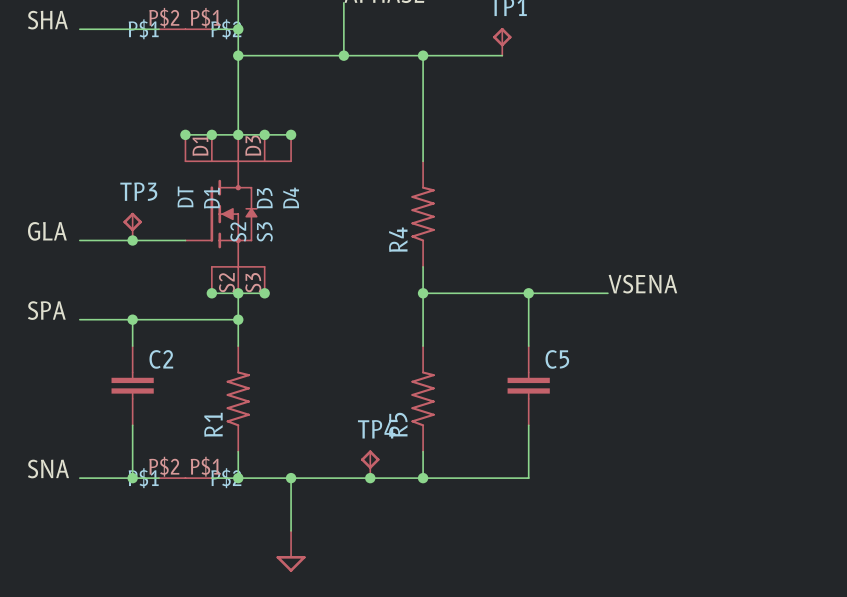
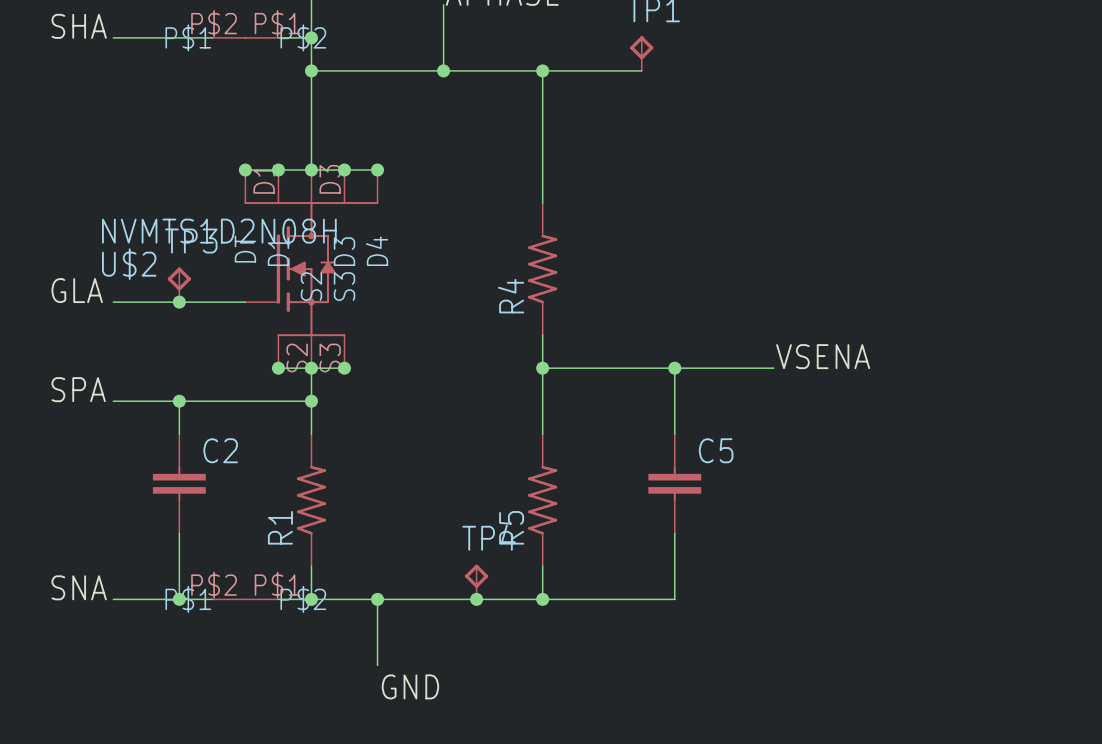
U$2 value: none -> NVMTS1D2N08H (219, 231)
U$2 name: none -> U$2 (129, 264)
label: none -> GND (410, 686)
power symbol: (291, 551) -> none

